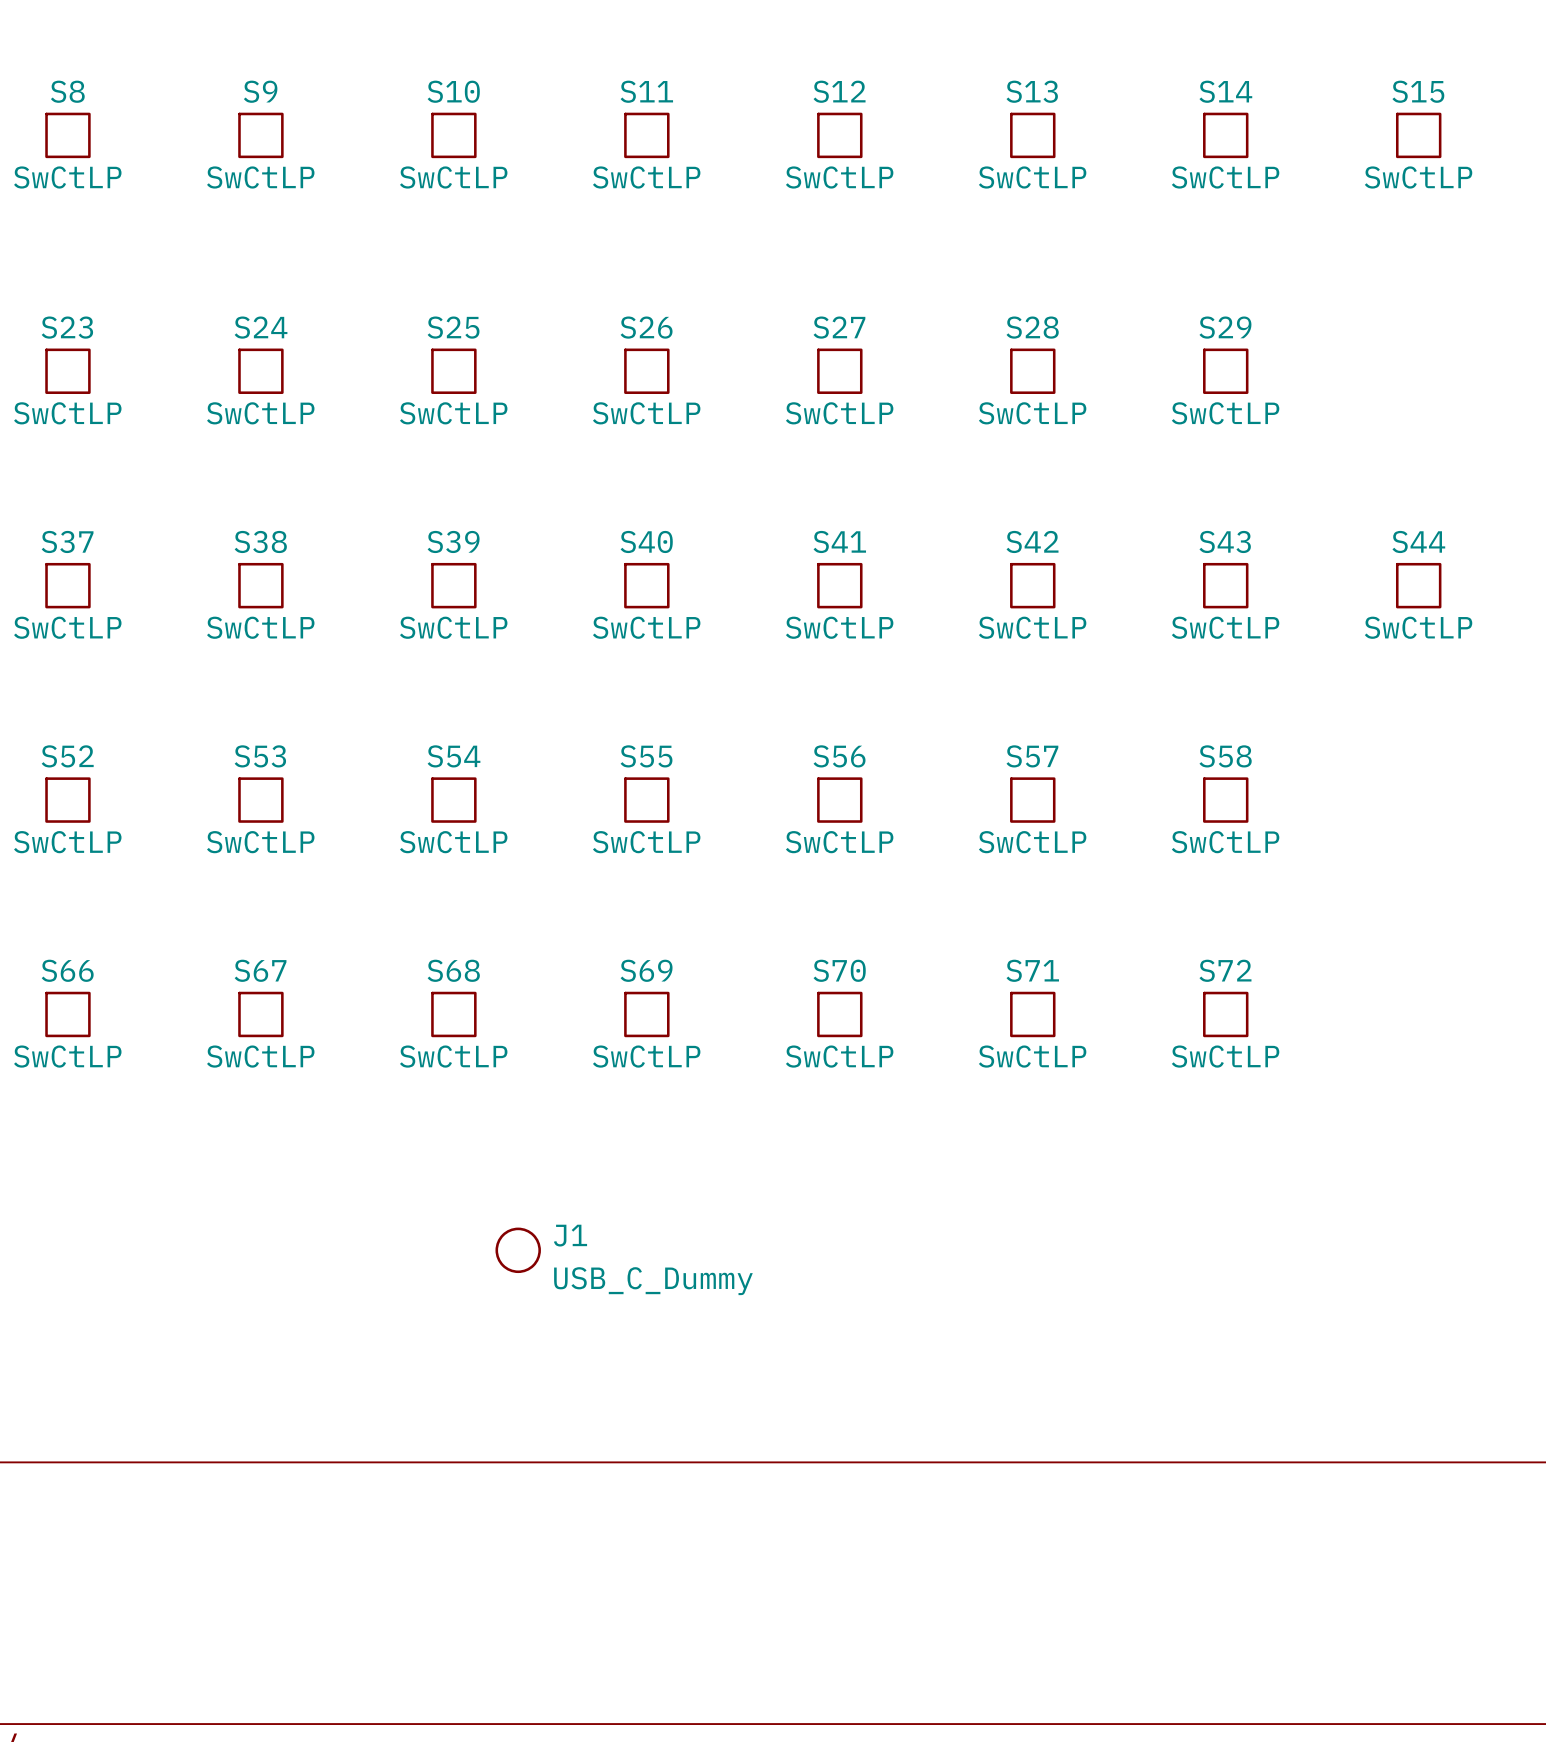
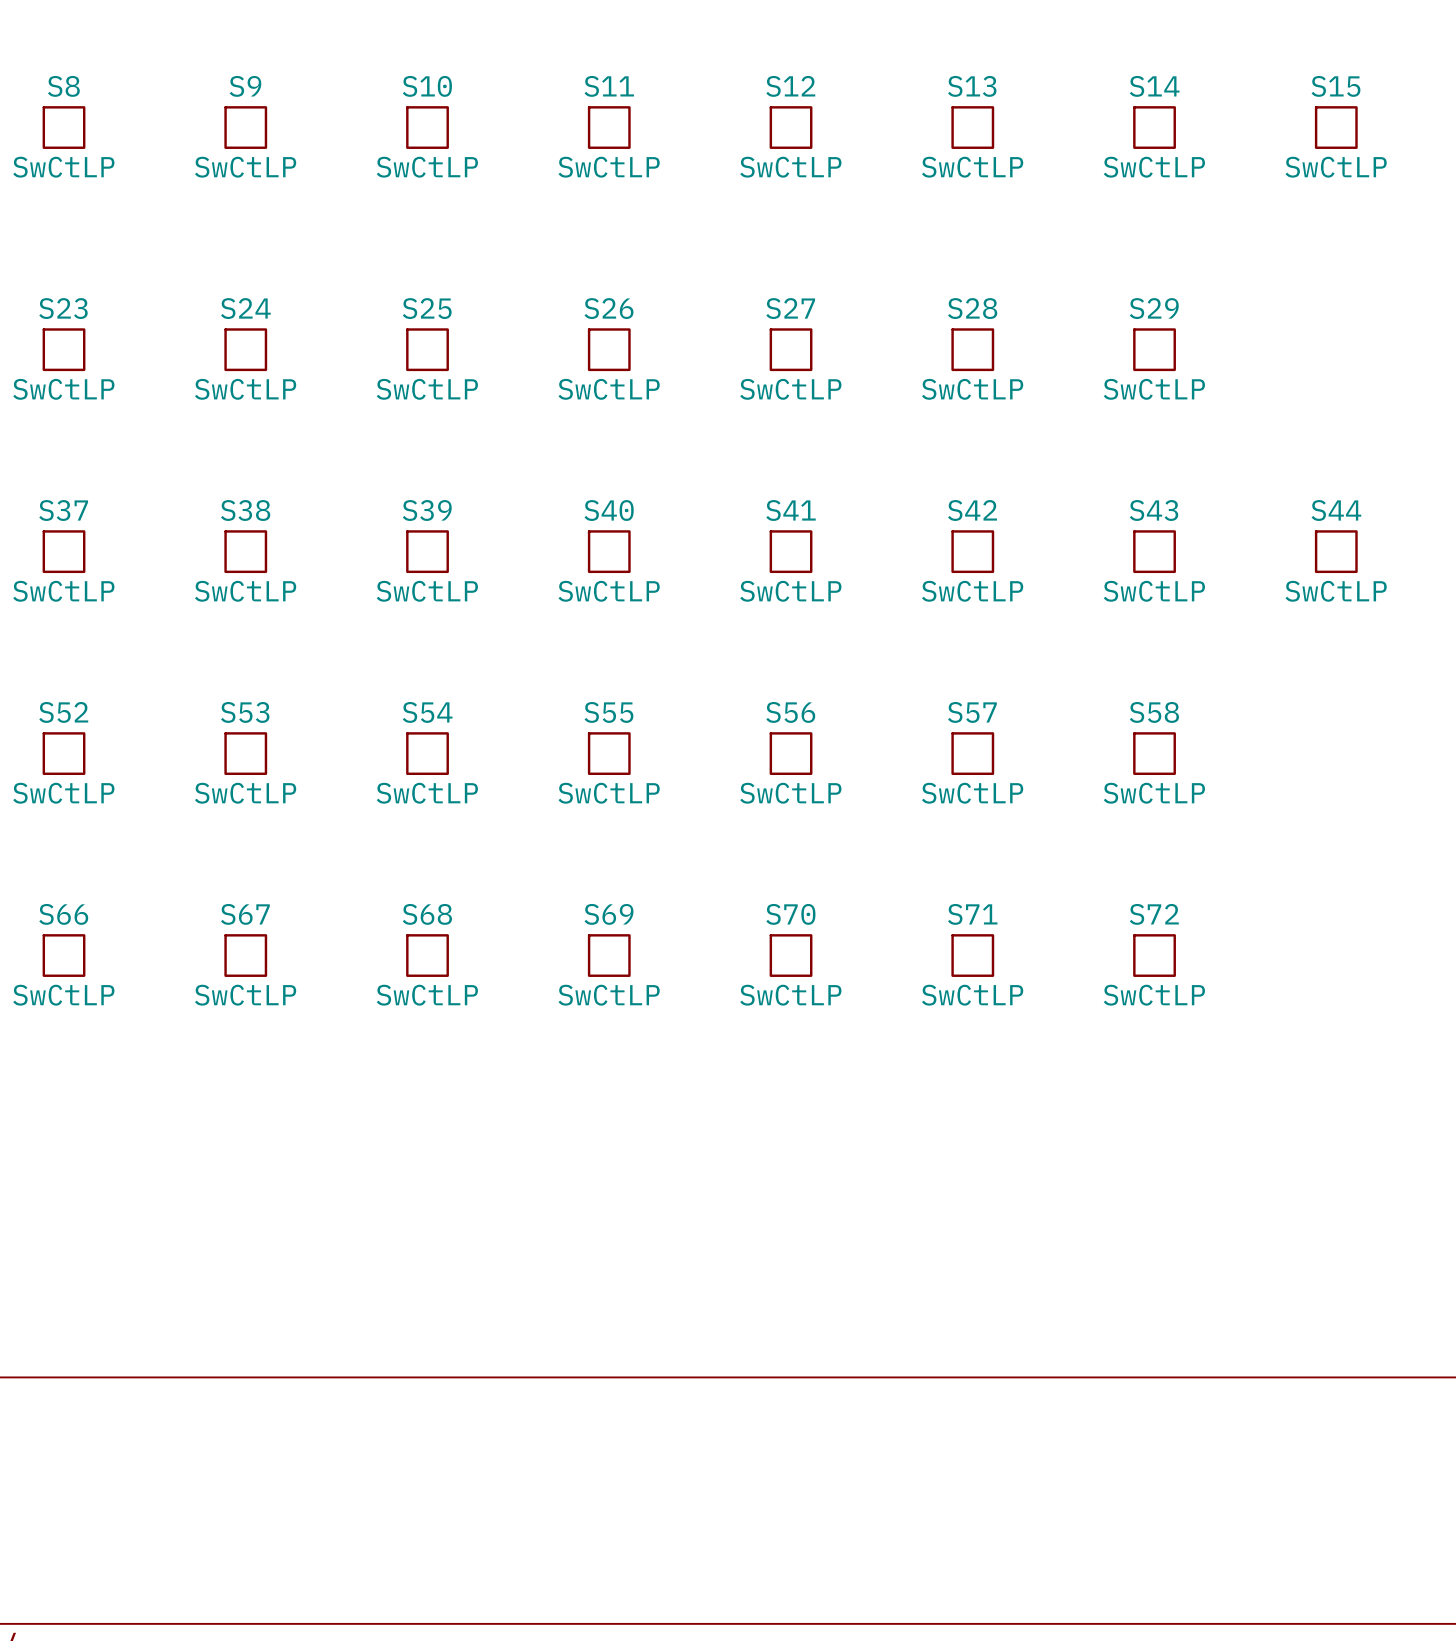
J1: USB_C_Dummy (518, 1250) -> none

